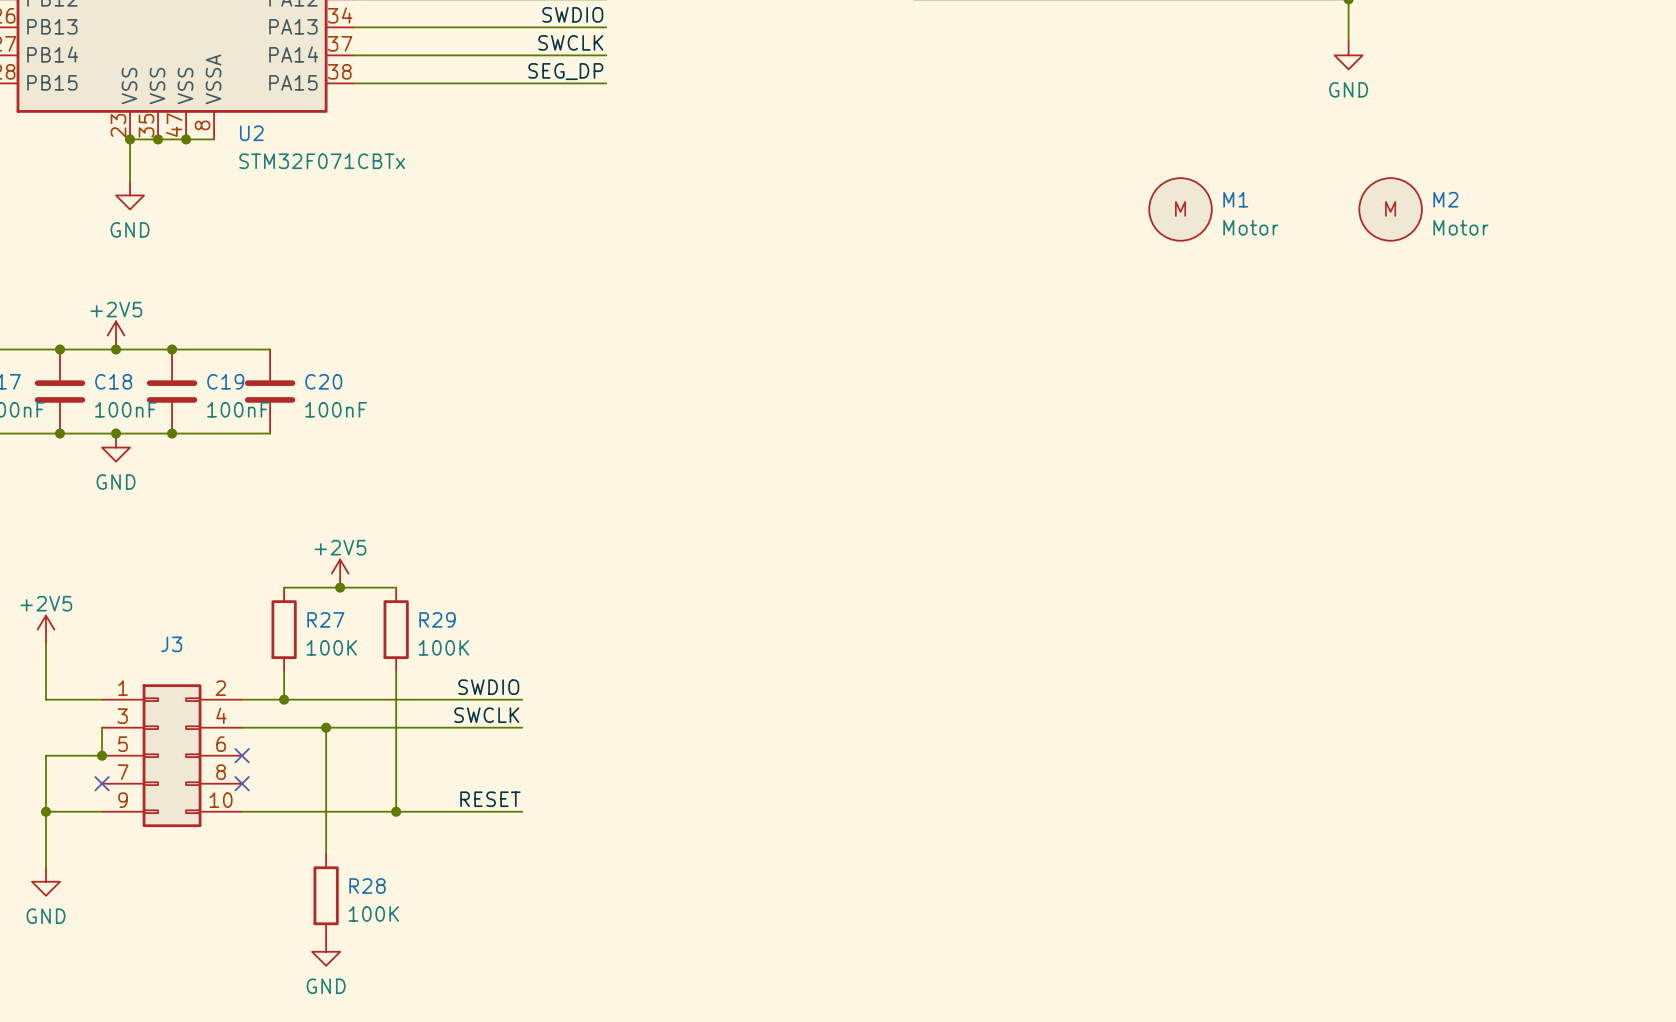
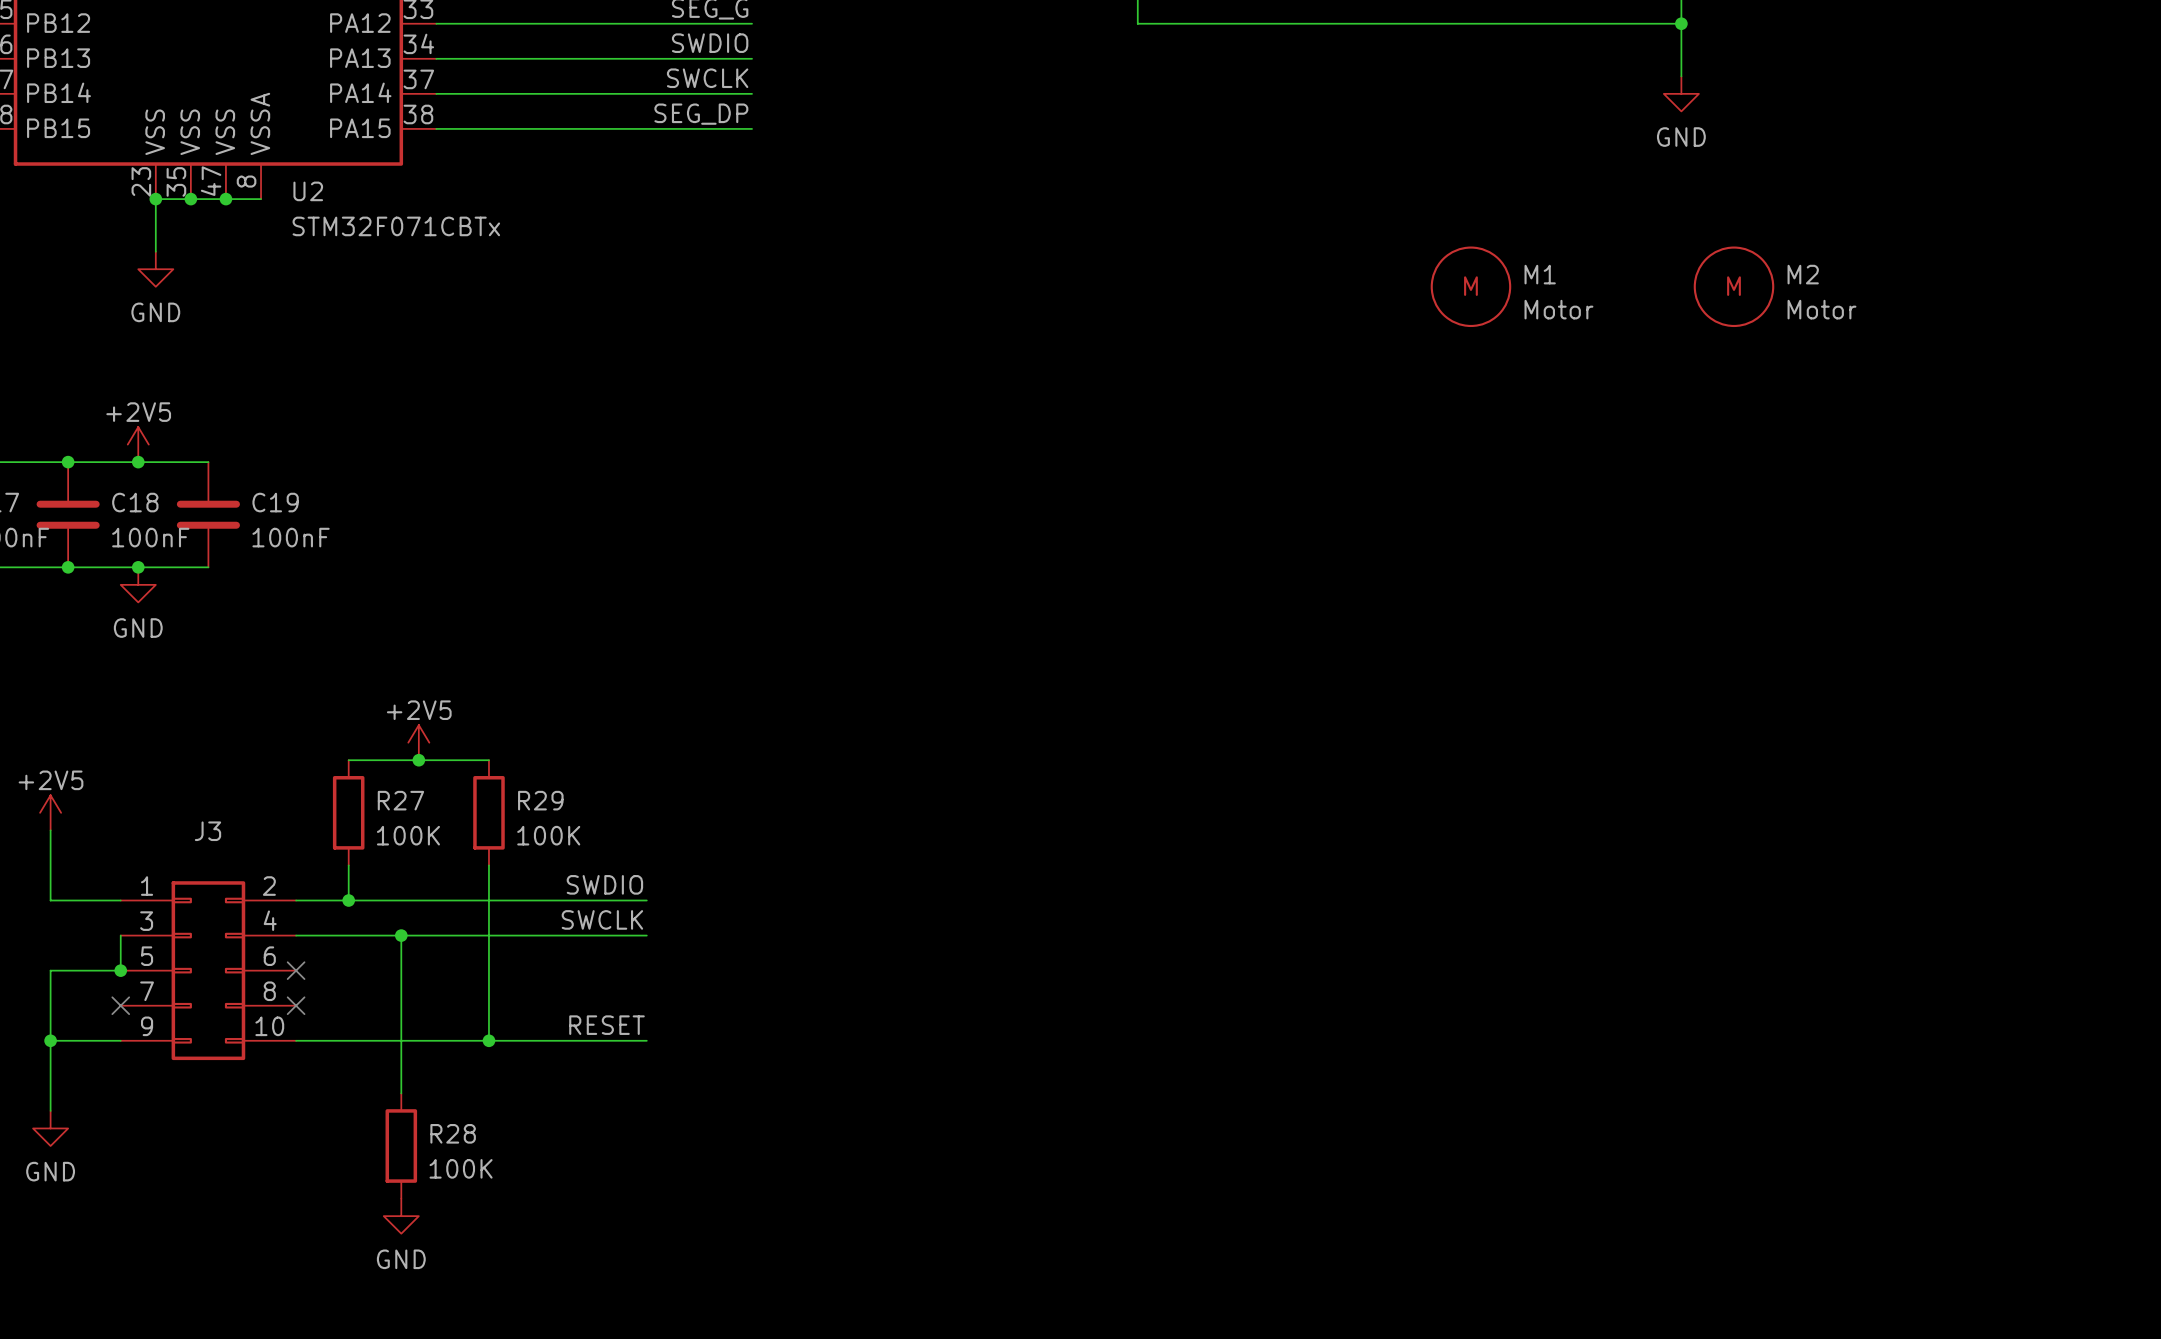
wire: (172, 349) (270, 349) -> none
junction: (172, 349) -> none
C20: 100nF (270, 391) -> none
wire: (172, 433) (270, 433) -> none
junction: (172, 433) -> none

